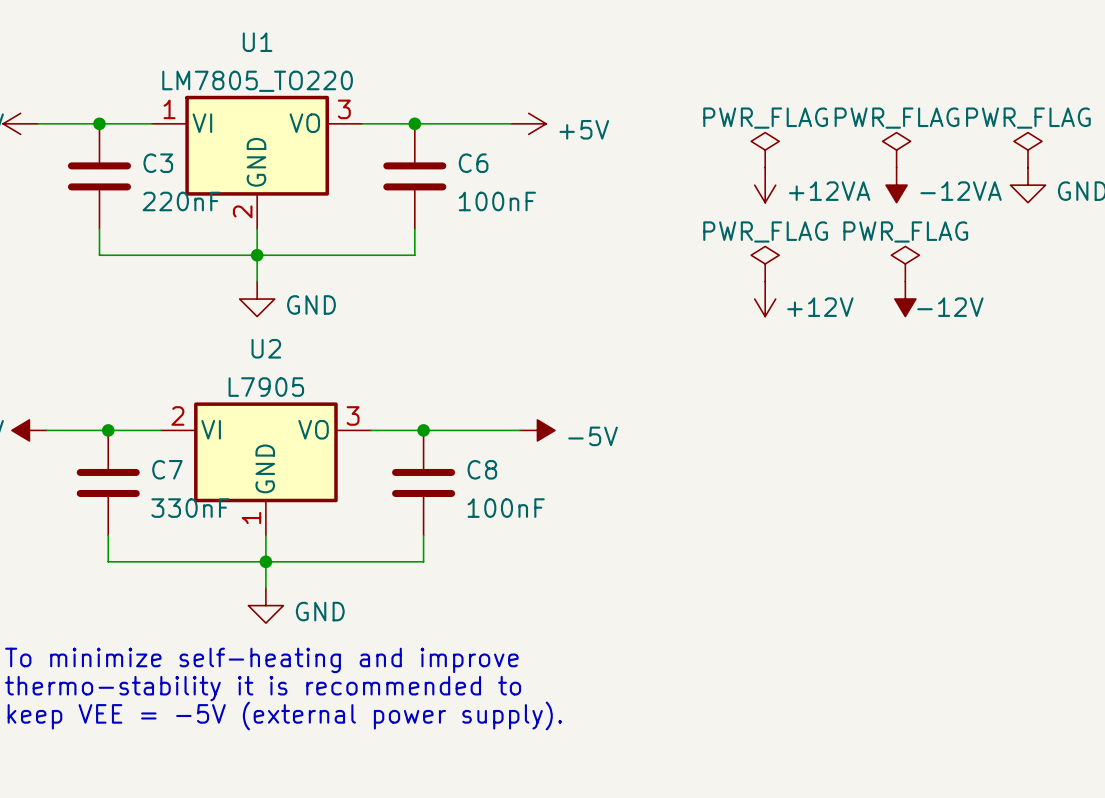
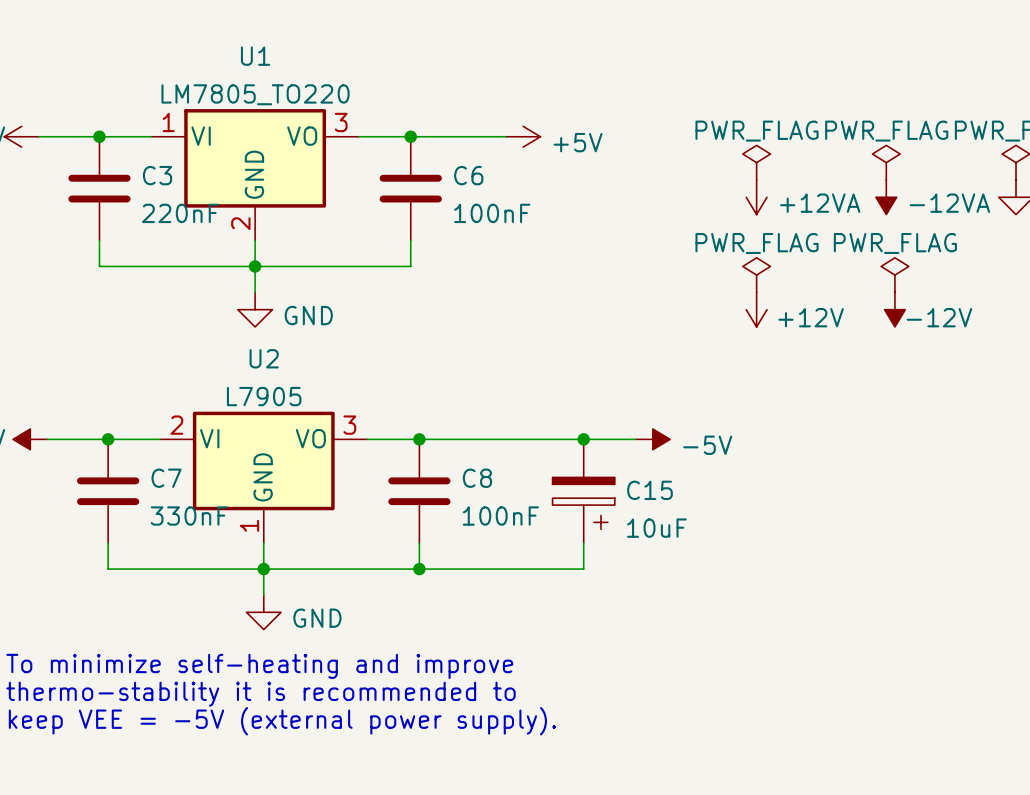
wire: none -> (514, 439) (635, 439)
power symbol position: -5V (537, 430) -> -5V (652, 439)
junction: none -> (583, 439)
C15: none -> 10uF (583, 491)
wire: none -> (583, 543) (583, 569) (419, 569)
junction: none -> (419, 569)

